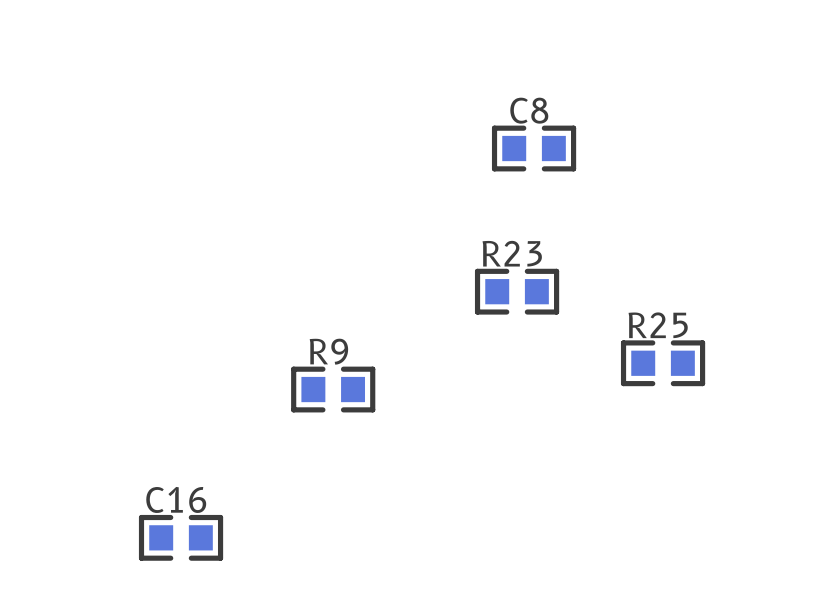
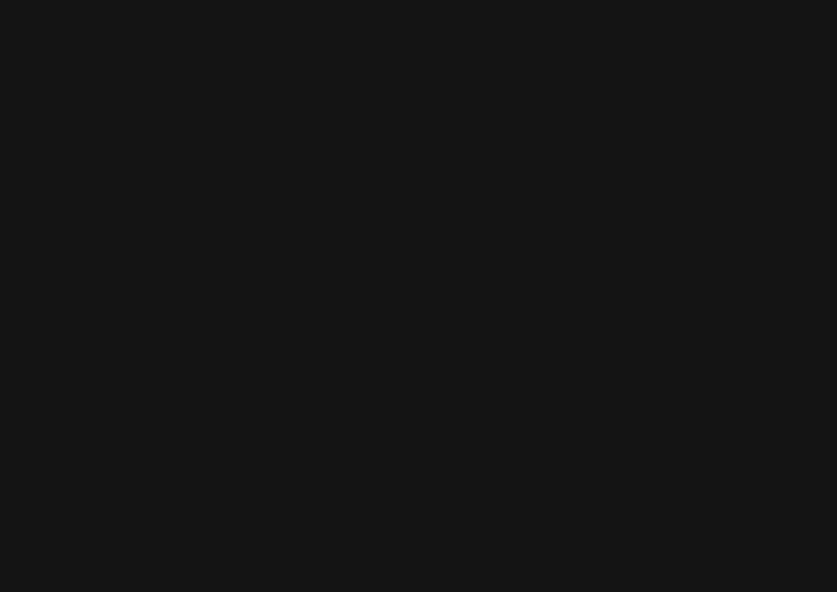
C8: (534, 148) -> none
R23: (517, 291) -> none
R25: (663, 363) -> none
R9: (333, 389) -> none
C16: (181, 537) -> none

